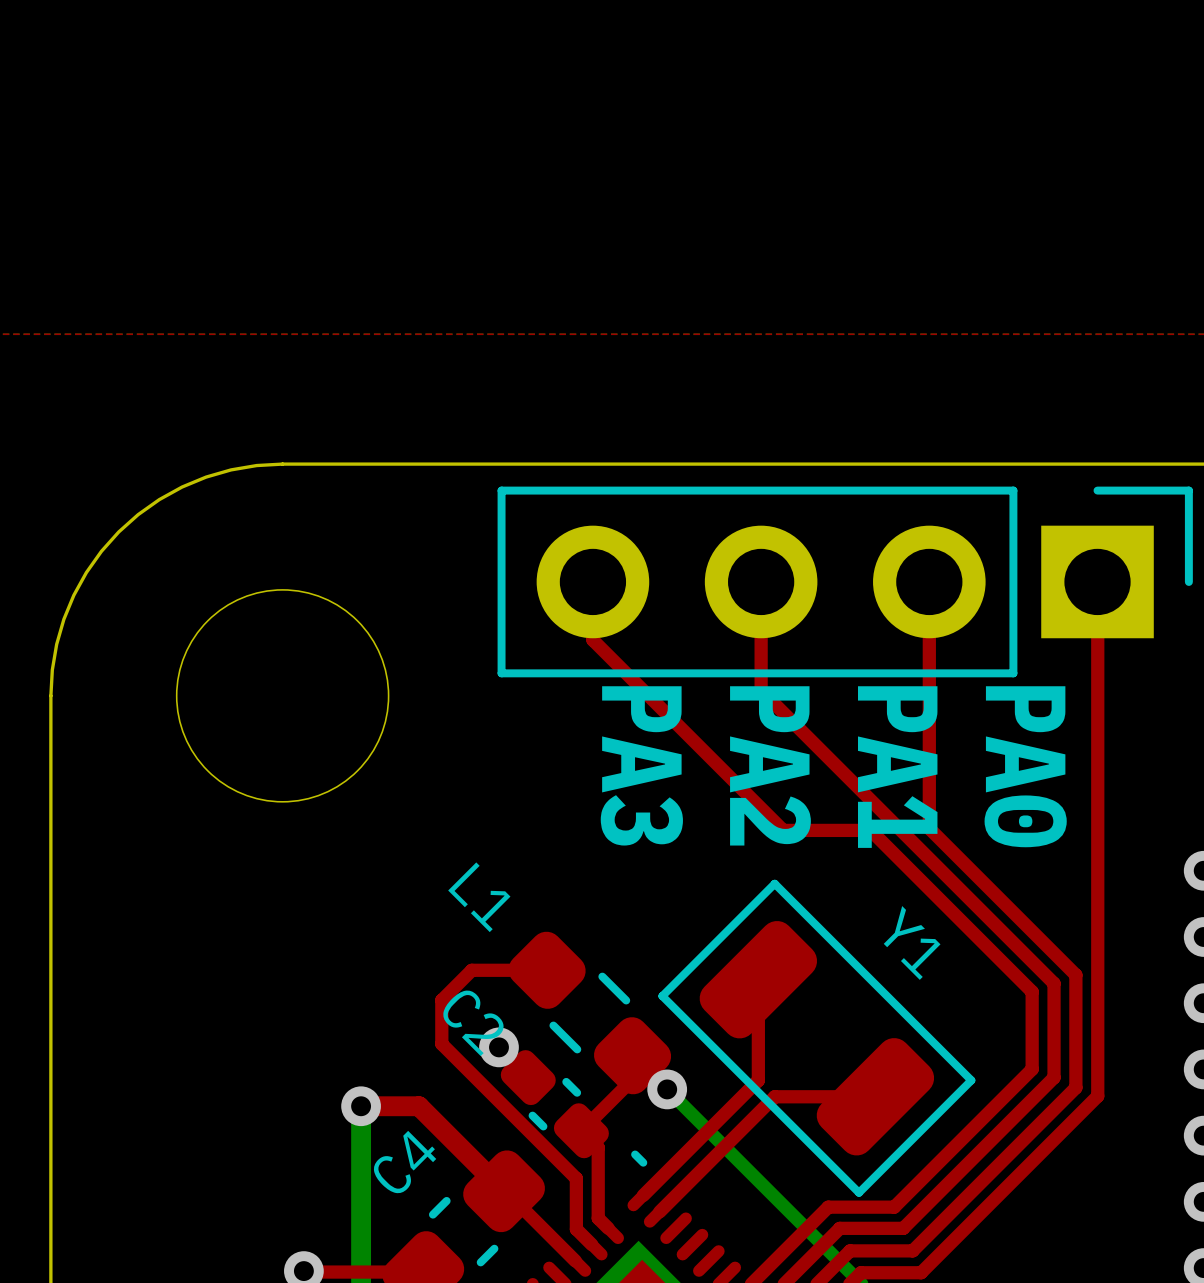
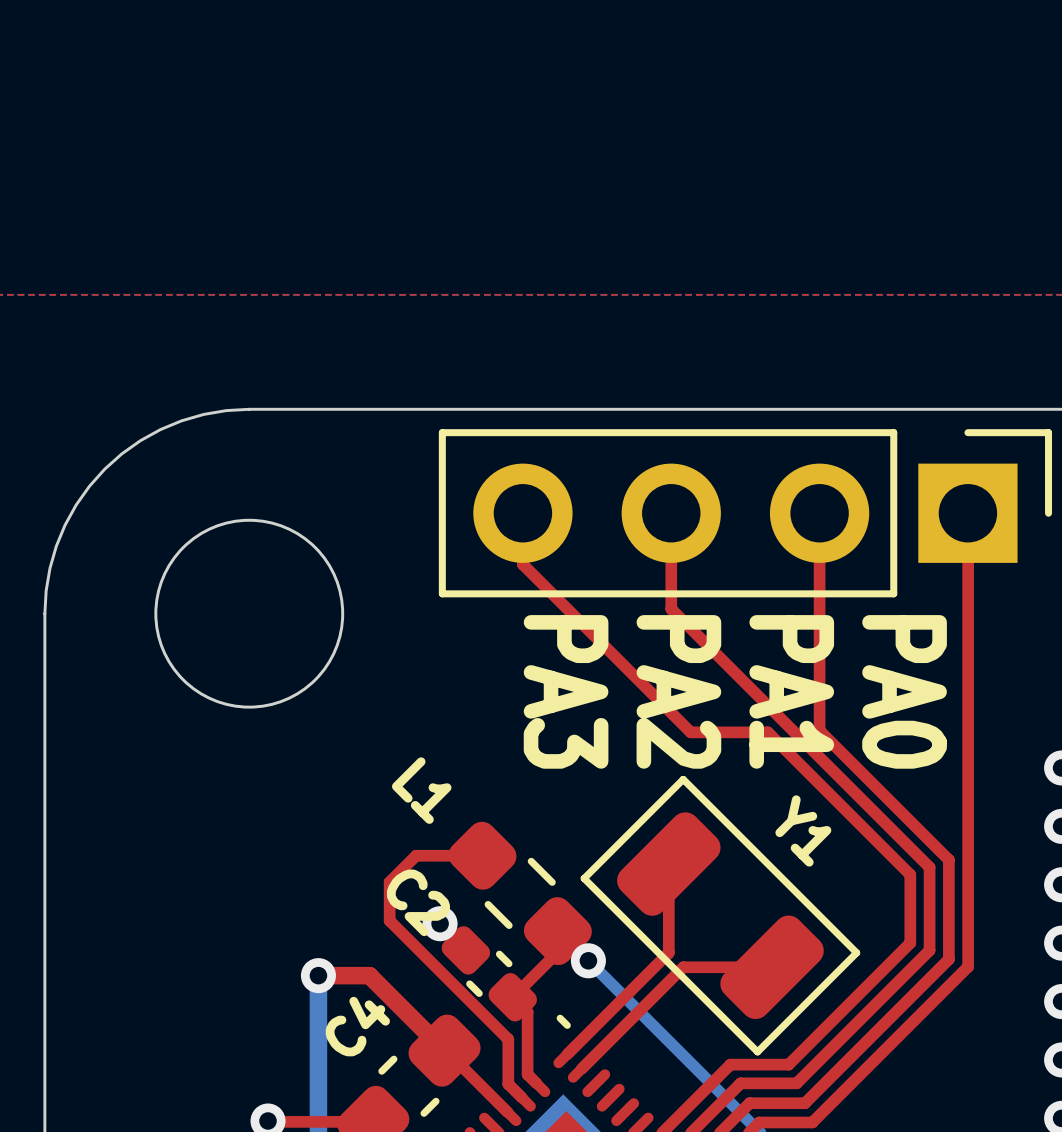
round board edge: none -> [154, 518, 345, 709]

